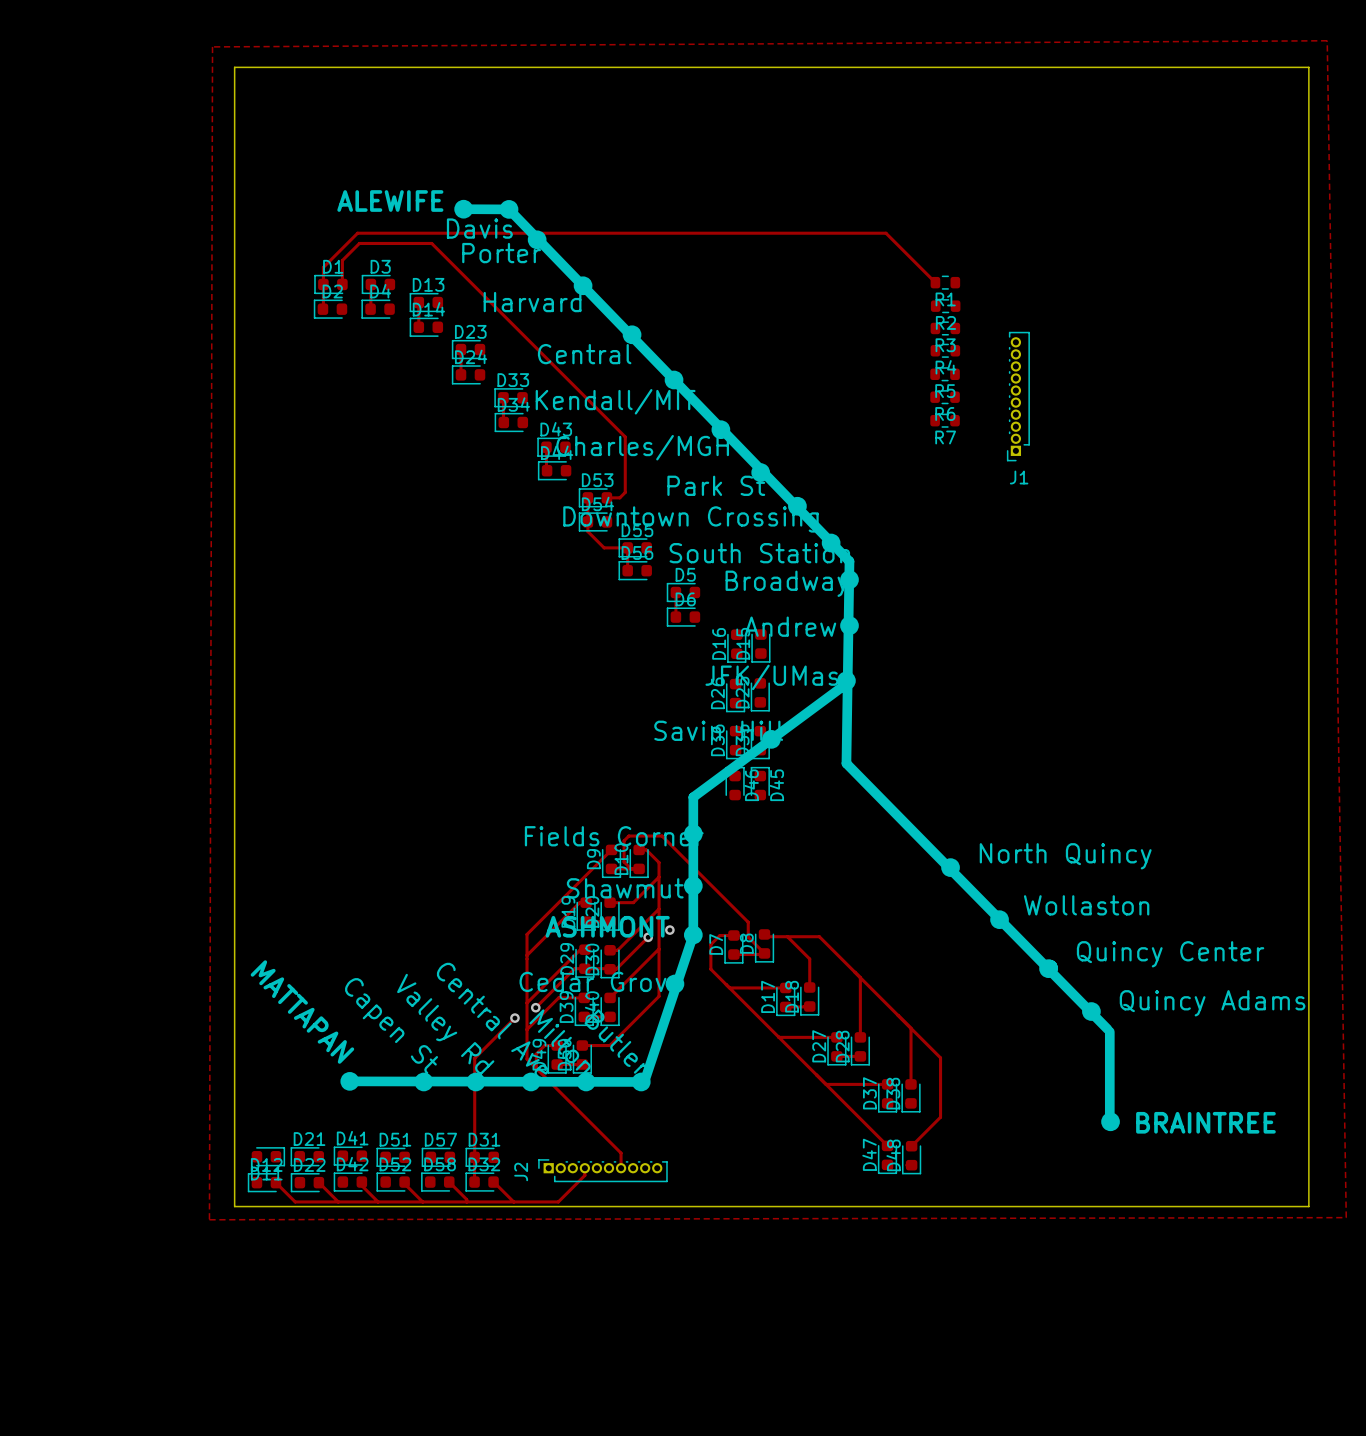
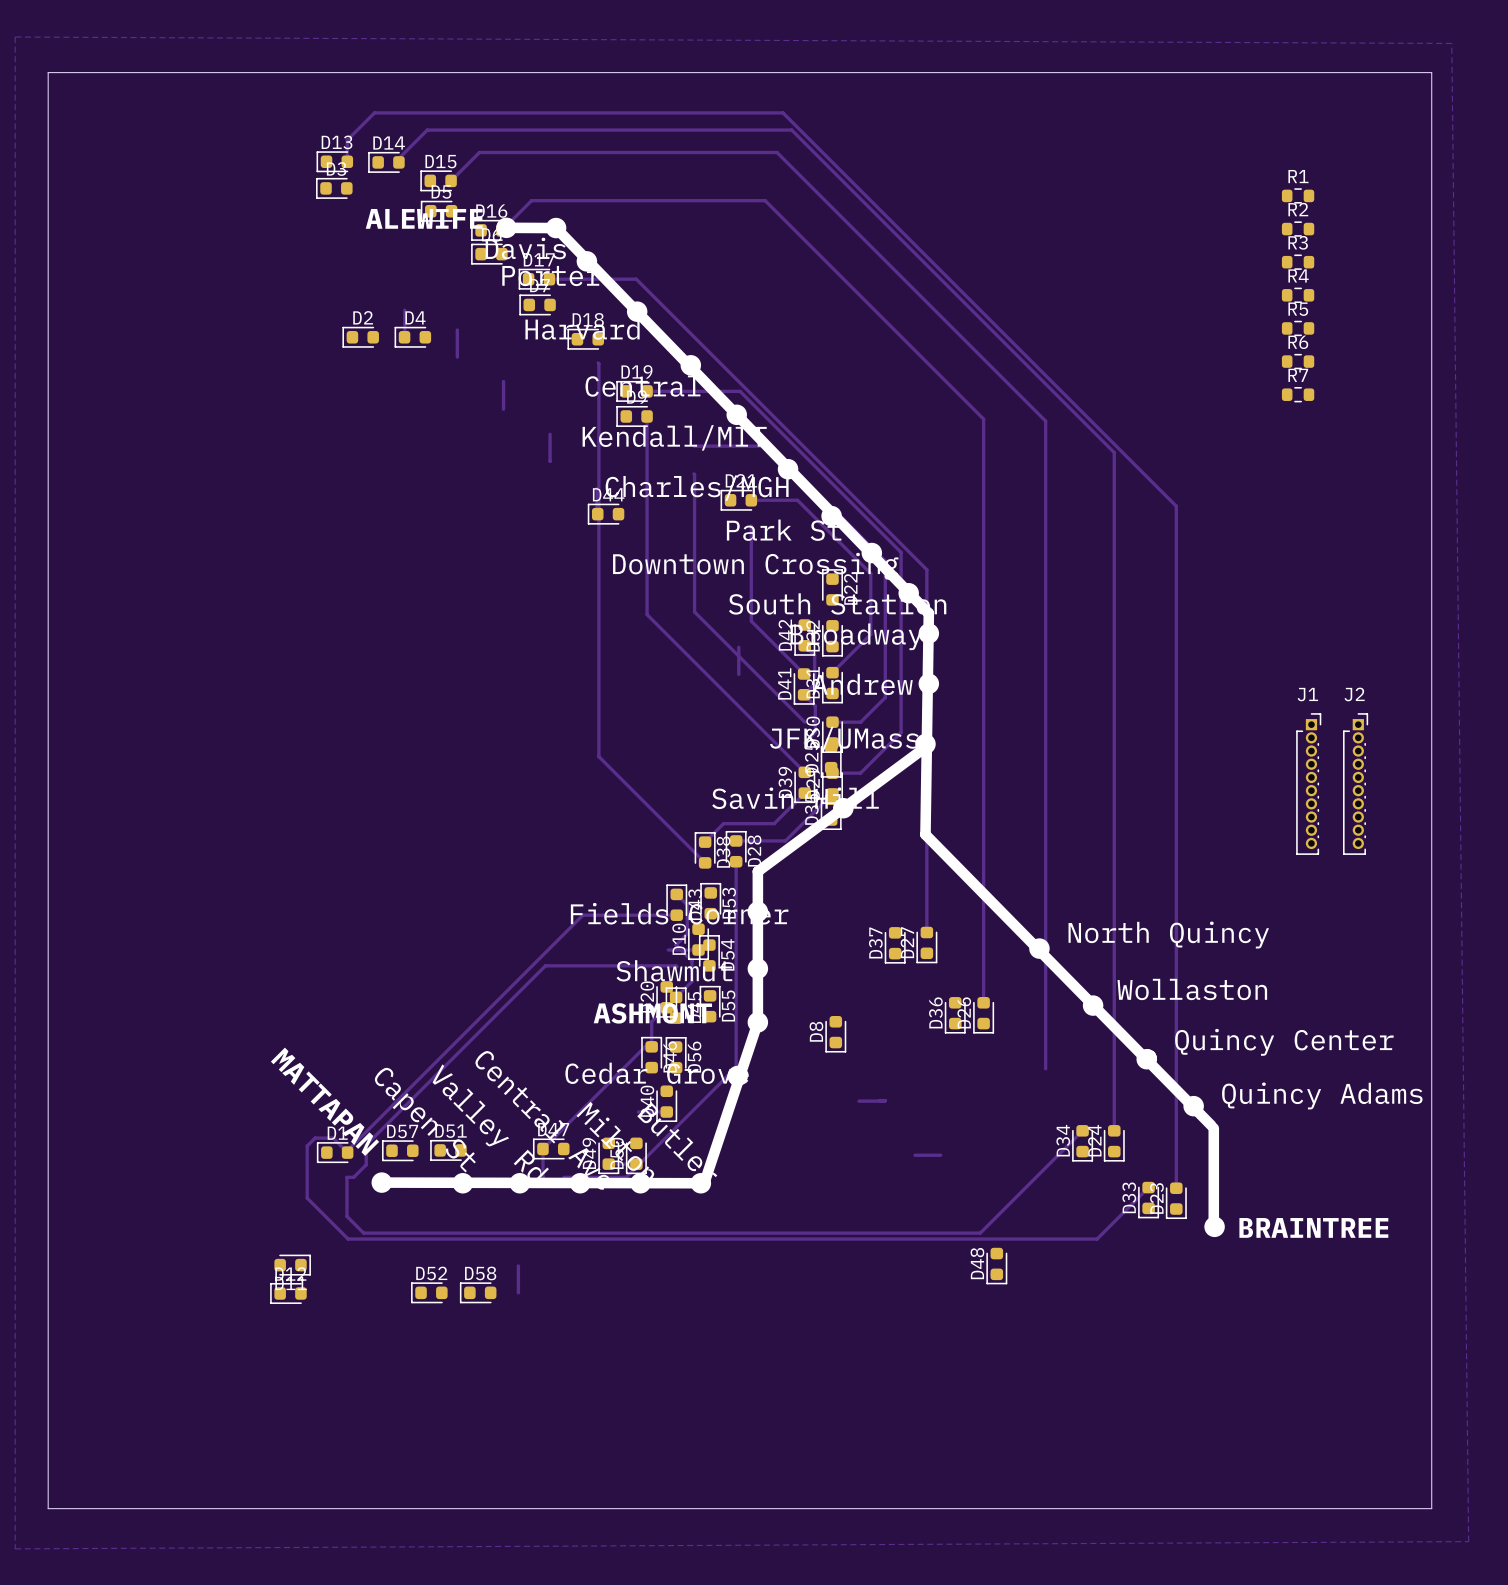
zone outline: (1327, 40) (212, 46) (209, 1219) (1346, 1217) (1327, 40) -> (15, 37) (15, 1548) (1468, 1541) (1451, 43) (15, 37)
board edge: (234, 67) (234, 1206) (1308, 1206) -> (255, 72) (48, 72) (48, 1508) (1431, 1508) (1431, 1319)
track: none -> (347, 161) (347, 140) (374, 112) (783, 112) (1176, 506) (1176, 1188)
track: none -> (398, 162) (398, 158) (427, 130) (791, 130) (1114, 452) (1114, 1130)
track: none -> (451, 180) (479, 152) (777, 152) (1045, 421) (1045, 1068)
track: none -> (501, 230) (531, 200) (765, 200) (983, 419) (983, 1002)
track: none -> (549, 279) (636, 279) (926, 569) (926, 932)
track: (935, 282) (885, 233) (357, 233) (323, 267) (322, 309) -> none
R1 position: (945, 282) -> (1298, 195)
D1 position: (330, 284) -> (335, 1152)
track: (342, 284) (342, 260) (359, 243) (431, 243) (625, 436) (625, 492) (619, 497) (606, 497) -> none
D3 position: (378, 284) -> (334, 188)
R1 name position: R1 (945, 299) -> R1 (1298, 176)
D13 position: (426, 302) -> (334, 161)
R2 position: (945, 306) -> (1298, 229)
R2 name position: R2 (945, 322) -> R2 (1298, 209)
D14 position: (426, 327) -> (386, 162)
R3 position: (945, 328) -> (1298, 262)
track: none -> (598, 363) (598, 756) (705, 862)
R3 name position: R3 (945, 345) -> R3 (1298, 242)
D23 rotation: 0° (468, 349) -> 90° counterclockwise (1176, 1200)
D23 position: (468, 349) -> (1176, 1200)
R4 position: (945, 350) -> (1298, 295)
track: none -> (647, 391) (740, 391) (901, 552) (901, 732) (860, 773) (832, 773)
R4 name position: R4 (945, 367) -> R4 (1298, 275)
D24 rotation: 0° (468, 374) -> 90° counterclockwise (1114, 1143)
D24 position: (468, 374) -> (1114, 1143)
R5 position: (945, 374) -> (1298, 328)
track: none -> (647, 416) (647, 614) (804, 772)
R5 name position: R5 (945, 391) -> R5 (1298, 309)
J1 rotation: 0° (1018, 396) -> 180° (1308, 784)
J1 position: (1018, 396) -> (1308, 784)
D33 rotation: 0° (511, 397) -> 90° counterclockwise (1148, 1200)
D33 position: (511, 397) -> (1148, 1200)
R6 position: (945, 397) -> (1298, 361)
track: none -> (693, 446) (770, 446) (885, 560) (885, 697) (860, 722) (832, 722)
R6 name position: R6 (945, 413) -> R6 (1298, 342)
R7 position: (945, 420) -> (1298, 394)
D34 rotation: 0° (511, 422) -> 90° counterclockwise (1082, 1143)
D34 position: (511, 422) -> (1082, 1143)
track: none -> (693, 473) (694, 611) (804, 722)
R7 name position: R7 (945, 437) -> R7 (1298, 375)
D43 rotation: 0° (554, 447) -> 90° clockwise (676, 902)
D43 position: (554, 447) -> (676, 902)
track: none -> (751, 500) (797, 500) (870, 573) (870, 634) (832, 672)
track: none -> (751, 526) (751, 621) (804, 674)
track: (587, 497) (587, 531) (604, 547) (627, 547) (627, 570) -> none
D53 rotation: 0° (595, 497) -> 90° clockwise (710, 901)
D53 position: (595, 497) -> (710, 901)
D54 rotation: 0° (595, 521) -> 90° clockwise (709, 953)
D54 position: (595, 521) -> (709, 953)
D55 rotation: 0° (635, 547) -> 90° clockwise (710, 1004)
D55 position: (635, 547) -> (710, 1004)
D56 rotation: 0° (635, 570) -> 90° clockwise (676, 1055)
D56 position: (635, 570) -> (676, 1055)
track: none -> (804, 645) (814, 655) (814, 684) (804, 694) (815, 706) (815, 732) (804, 742)
D5 position: (683, 592) -> (439, 211)
D6 position: (683, 617) -> (489, 254)
D15 rotation: 0° (760, 645) -> 90° clockwise (438, 180)
D15 position: (760, 645) -> (438, 180)
D16 rotation: 0° (736, 646) -> 90° clockwise (489, 230)
D16 position: (736, 646) -> (489, 230)
D26 position: (735, 695) -> (983, 1015)
track: none -> (804, 793) (774, 823) (723, 823) (705, 842)
track: none -> (832, 793) (785, 840) (736, 840)
D36 position: (735, 742) -> (955, 1015)
D46 position: (735, 783) -> (651, 1055)
D45 position: (760, 783) -> (676, 1005)
track: none -> (736, 861) (736, 1067) (626, 1177) (563, 1177)
track: none -> (676, 894) (687, 904) (687, 933) (676, 945) (691, 960) (691, 981) (651, 1021) (651, 1046) (645, 1046) (542, 1148) (542, 1177)
track: none -> (676, 915) (582, 915) (347, 1150) (347, 1152) (333, 1138) (315, 1138) (307, 1146) (307, 1198) (348, 1239) (1097, 1239) (1148, 1187)
track: (611, 849) (527, 934) (527, 1059) (621, 1153) (621, 1168) -> none
track: (639, 849) (646, 849) (659, 862) (659, 996) (609, 1045) (582, 1045) -> none
D9 rotation: 0° (611, 861) -> 90° clockwise (634, 416)
D9 position: (611, 861) -> (634, 416)
track: (631, 868) (624, 861) (624, 840) (628, 836) (662, 836) (748, 922) (748, 937) (764, 953) (733, 954) -> none
track: (659, 877) (633, 902) (610, 902) -> none
track: none -> (676, 966) (545, 965) (366, 1145) (366, 1164) (353, 1177) (346, 1177) (346, 1216) (363, 1233) (980, 1233) (1082, 1130)
track: (586, 902) (579, 902) (527, 955) -> none
track: (659, 908) (617, 950) (610, 950) -> none
D19 rotation: 0° (586, 914) -> 90° clockwise (634, 391)
D19 position: (586, 914) -> (634, 391)
via: (669, 930) -> none
track: (764, 934) (764, 936) (819, 936) (940, 1057) (940, 1117) (911, 1146) -> none
track: (738, 935) (719, 935) (710, 944) (710, 969) (887, 1145) -> none
track: (787, 936) (809, 959) (809, 987) -> none
track: (648, 937) (616, 969) (574, 968) (535, 1007) -> none
via: (648, 937) -> none
D7 rotation: 0° (733, 946) -> 90° clockwise (537, 304)
D7 position: (733, 946) -> (537, 304)
track: (584, 949) (580, 949) (527, 1003) -> none
track: (659, 949) (610, 997) -> none
D29 position: (584, 961) -> (832, 785)
D30 position: (610, 961) -> (832, 734)
track: (860, 977) (860, 1037) -> none
track: (729, 987) (785, 987) -> none
track: (584, 997) (558, 997) (527, 1029) -> none
D18 rotation: 0° (809, 998) -> 90° clockwise (585, 339)
D18 position: (809, 998) -> (585, 339)
D17 rotation: 0° (785, 999) -> 90° clockwise (536, 279)
D17 position: (785, 999) -> (536, 279)
via: (535, 1007) -> none
D39 position: (584, 1009) -> (804, 784)
track: (514, 1018) (474, 1058) (474, 1157) -> none
via: (514, 1018) -> none
track: (911, 1028) (911, 1084) -> none
track: (778, 1037) (836, 1037) -> none
track: (557, 1045) (544, 1045) (536, 1054) (536, 1068) -> none
D27 position: (836, 1048) -> (926, 945)
D28 rotation: 0° (860, 1048) -> 180° (736, 849)
D28 position: (860, 1048) -> (736, 849)
track: (826, 1084) (887, 1084) -> none
D37 position: (887, 1095) -> (895, 945)
D38 rotation: 0° (911, 1095) -> 180° (705, 850)
D38 position: (911, 1095) -> (705, 850)
D21 position: (307, 1156) -> (738, 500)
D41 rotation: 0° (350, 1156) -> 90° counterclockwise (804, 686)
D41 position: (350, 1156) -> (804, 686)
D51 position: (393, 1157) -> (448, 1150)
D57 position: (438, 1157) -> (400, 1150)
D31 rotation: 0° (482, 1157) -> 90° counterclockwise (832, 685)
D31 position: (482, 1157) -> (832, 685)
D47 rotation: 0° (887, 1157) -> 90° clockwise (551, 1148)
D47 position: (887, 1157) -> (551, 1148)
track: (584, 1168) (584, 1175) (558, 1201) (295, 1201) (275, 1182) -> none
J2 rotation: 0° (602, 1170) -> 90° clockwise (1355, 784)
J2 position: (602, 1170) -> (1355, 784)
D22 rotation: 0° (307, 1182) -> 90° clockwise (832, 587)
D22 position: (307, 1182) -> (832, 587)
track: (319, 1182) (338, 1201) -> none
D42 rotation: 0° (350, 1182) -> 90° counterclockwise (804, 637)
D42 position: (350, 1182) -> (804, 637)
track: (361, 1182) (361, 1185) (378, 1201) -> none
track: (404, 1182) (422, 1201) -> none
track: (449, 1182) (466, 1199) (466, 1201) -> none
D32 rotation: 0° (482, 1182) -> 90° counterclockwise (832, 638)
D32 position: (482, 1182) -> (832, 638)
track: (493, 1182) (513, 1201) -> none

